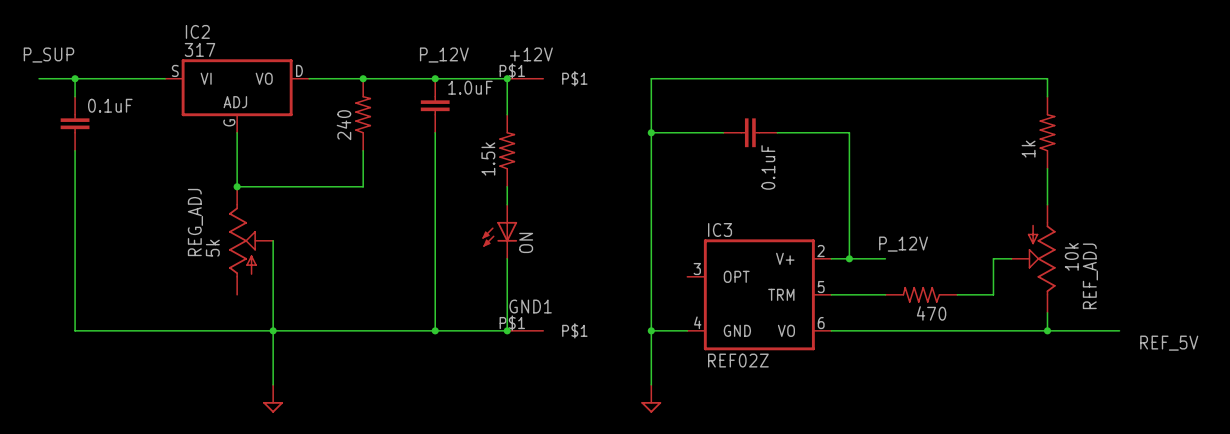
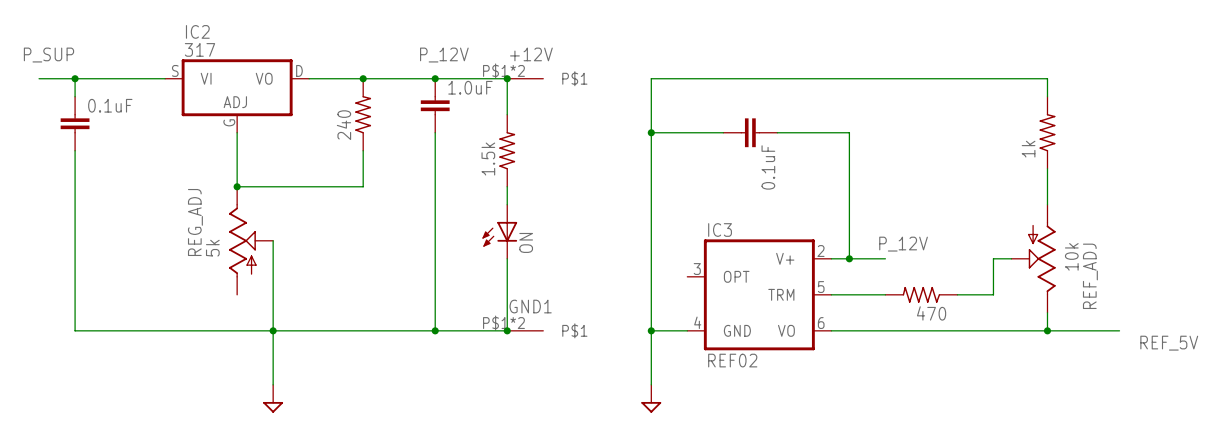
+12V pin number: P$1 (512, 70) -> P$1*2 (503, 70)
GND1 pin number: P$1 (512, 323) -> P$1*2 (503, 323)
IC3 value: REF02Z (738, 360) -> REF02 (732, 360)

